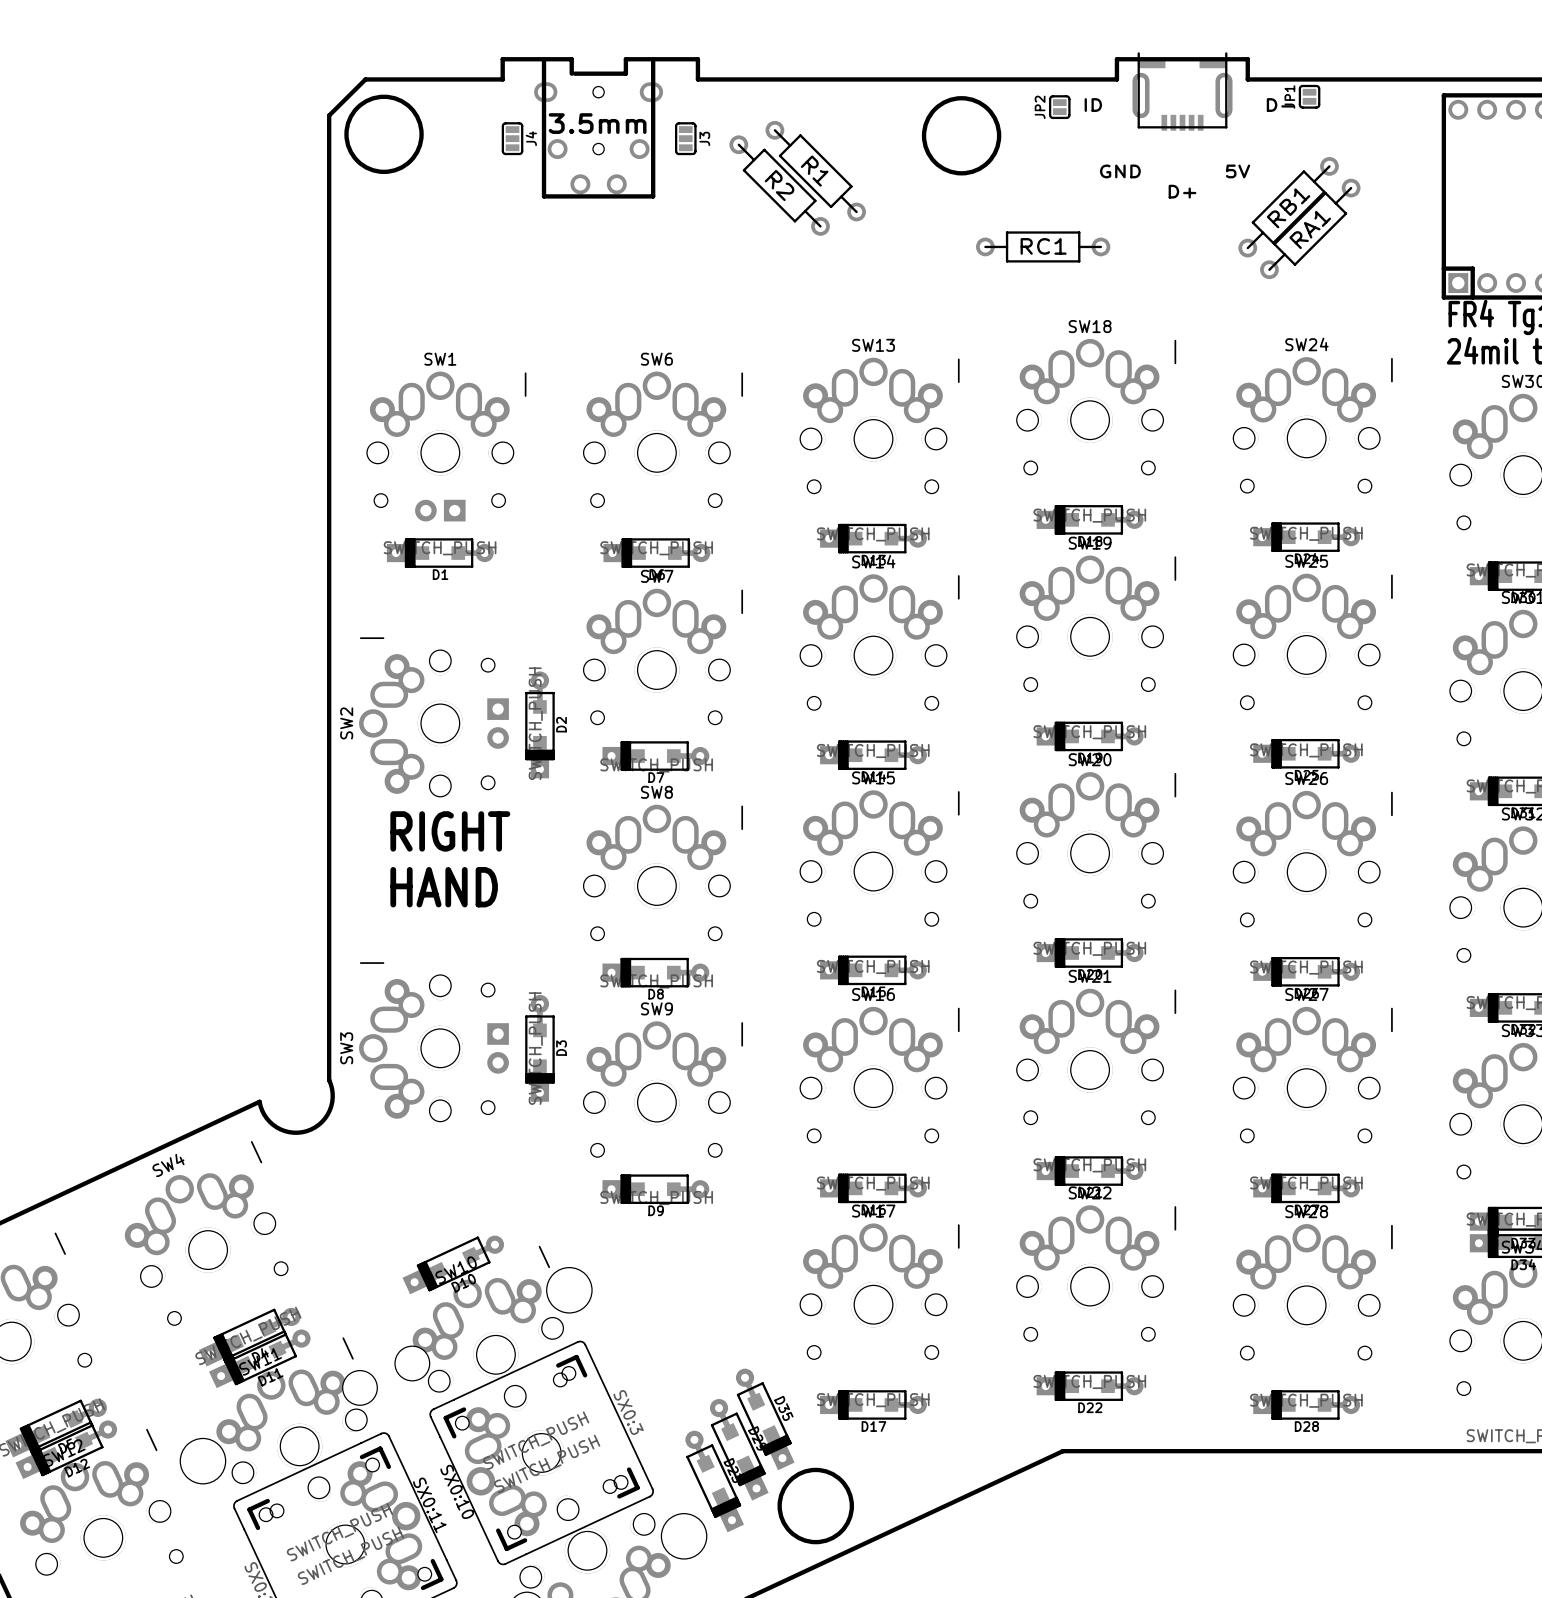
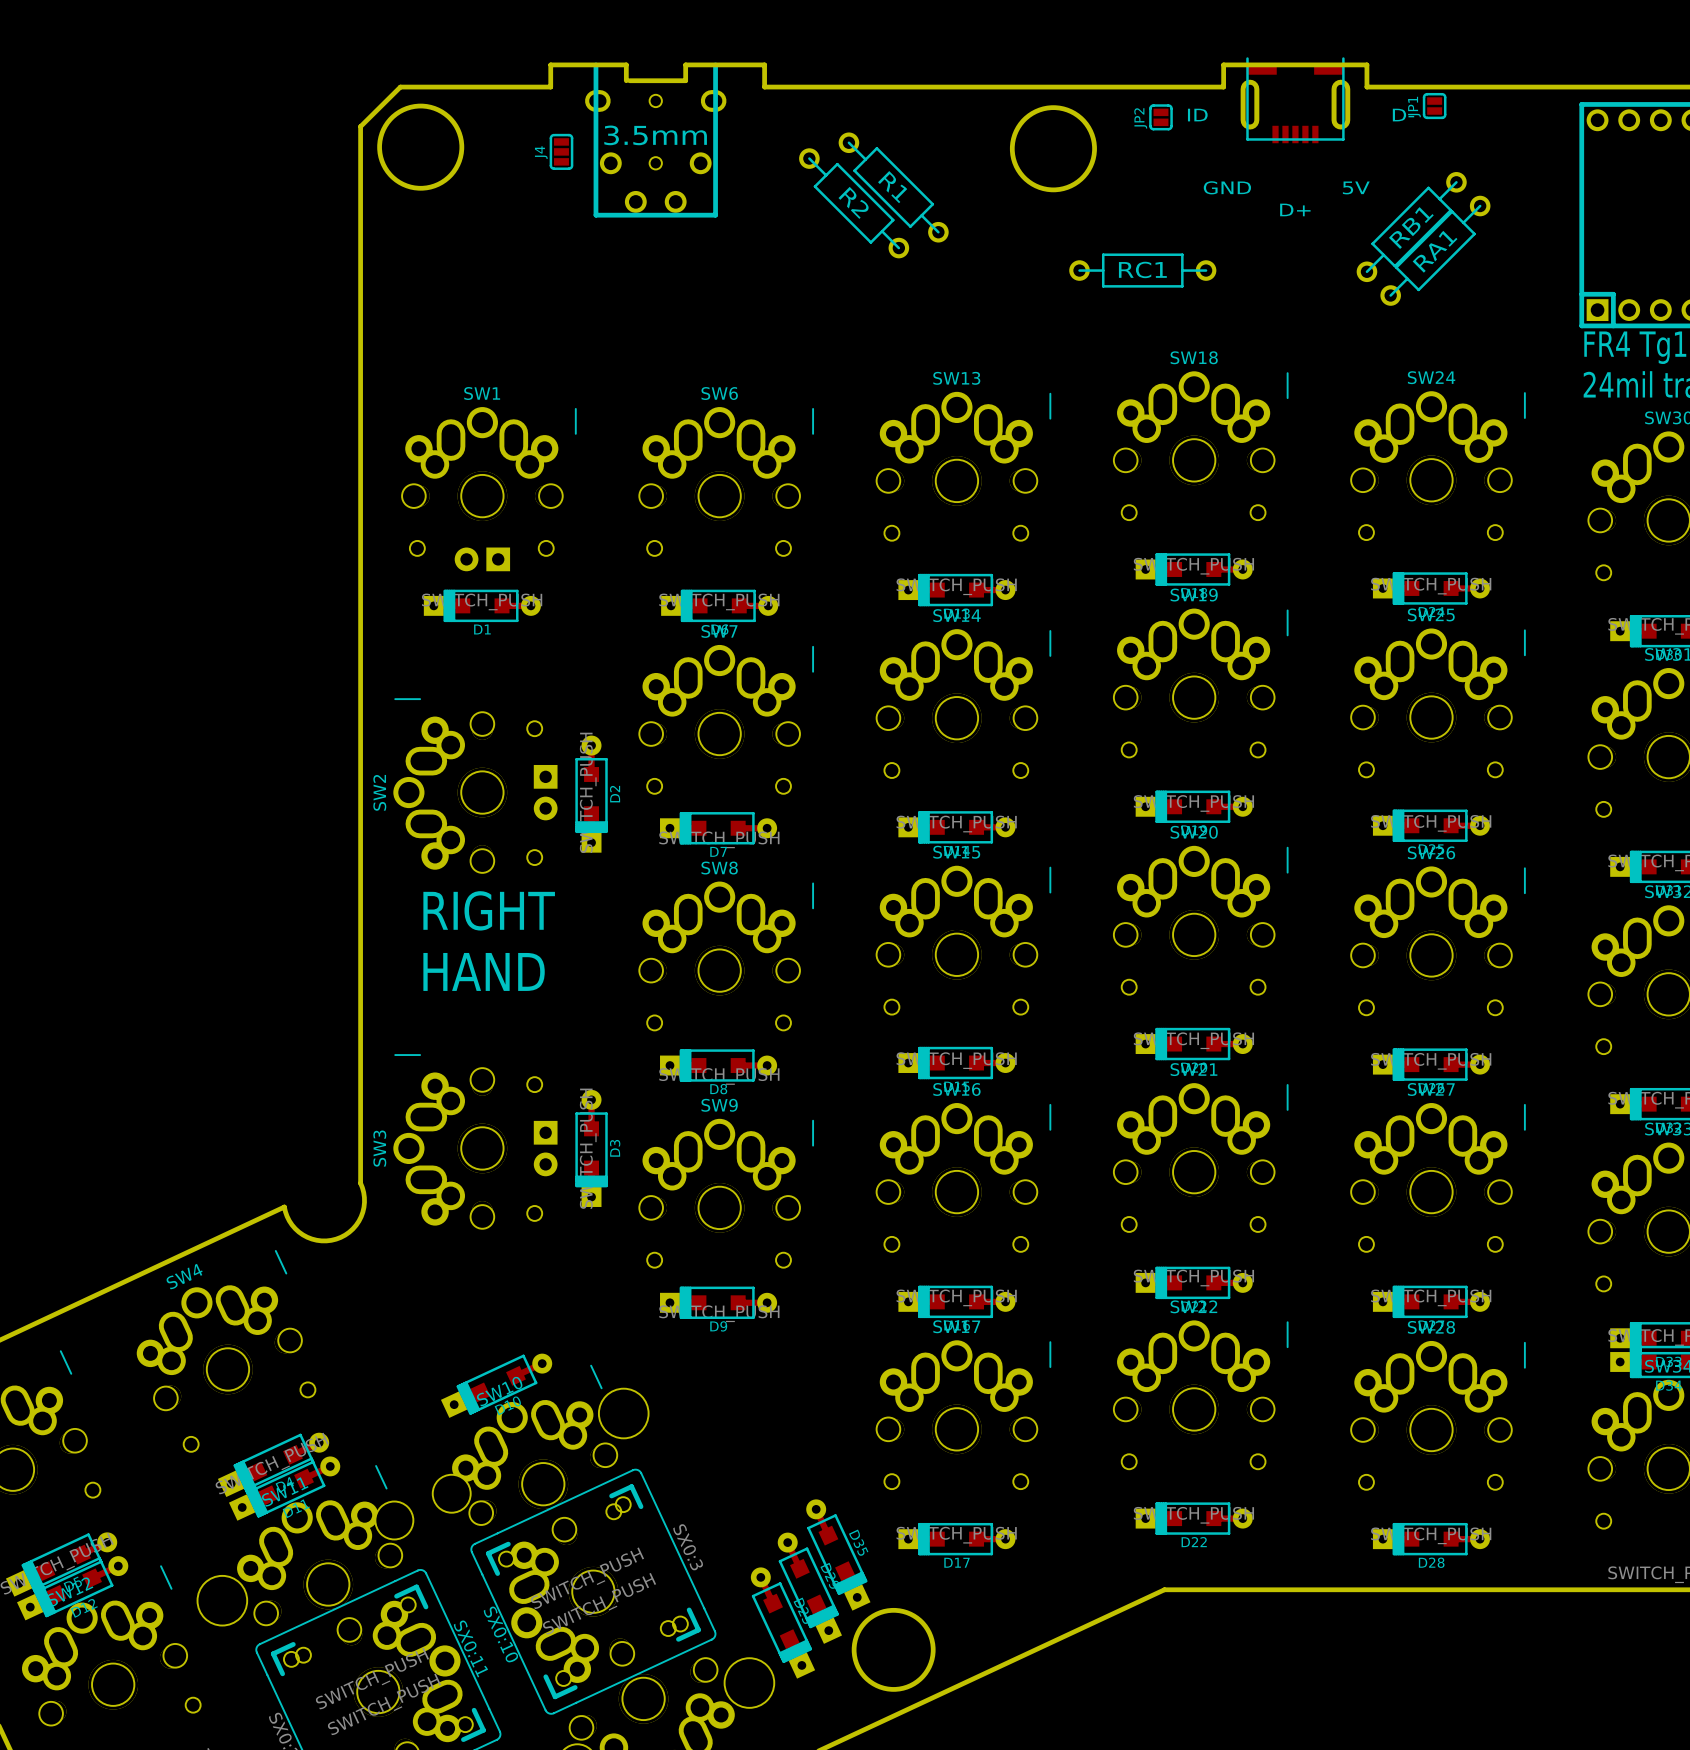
J4 rotation: 0° (512, 138) -> 180° (561, 151)
J3: (685, 138) -> none

